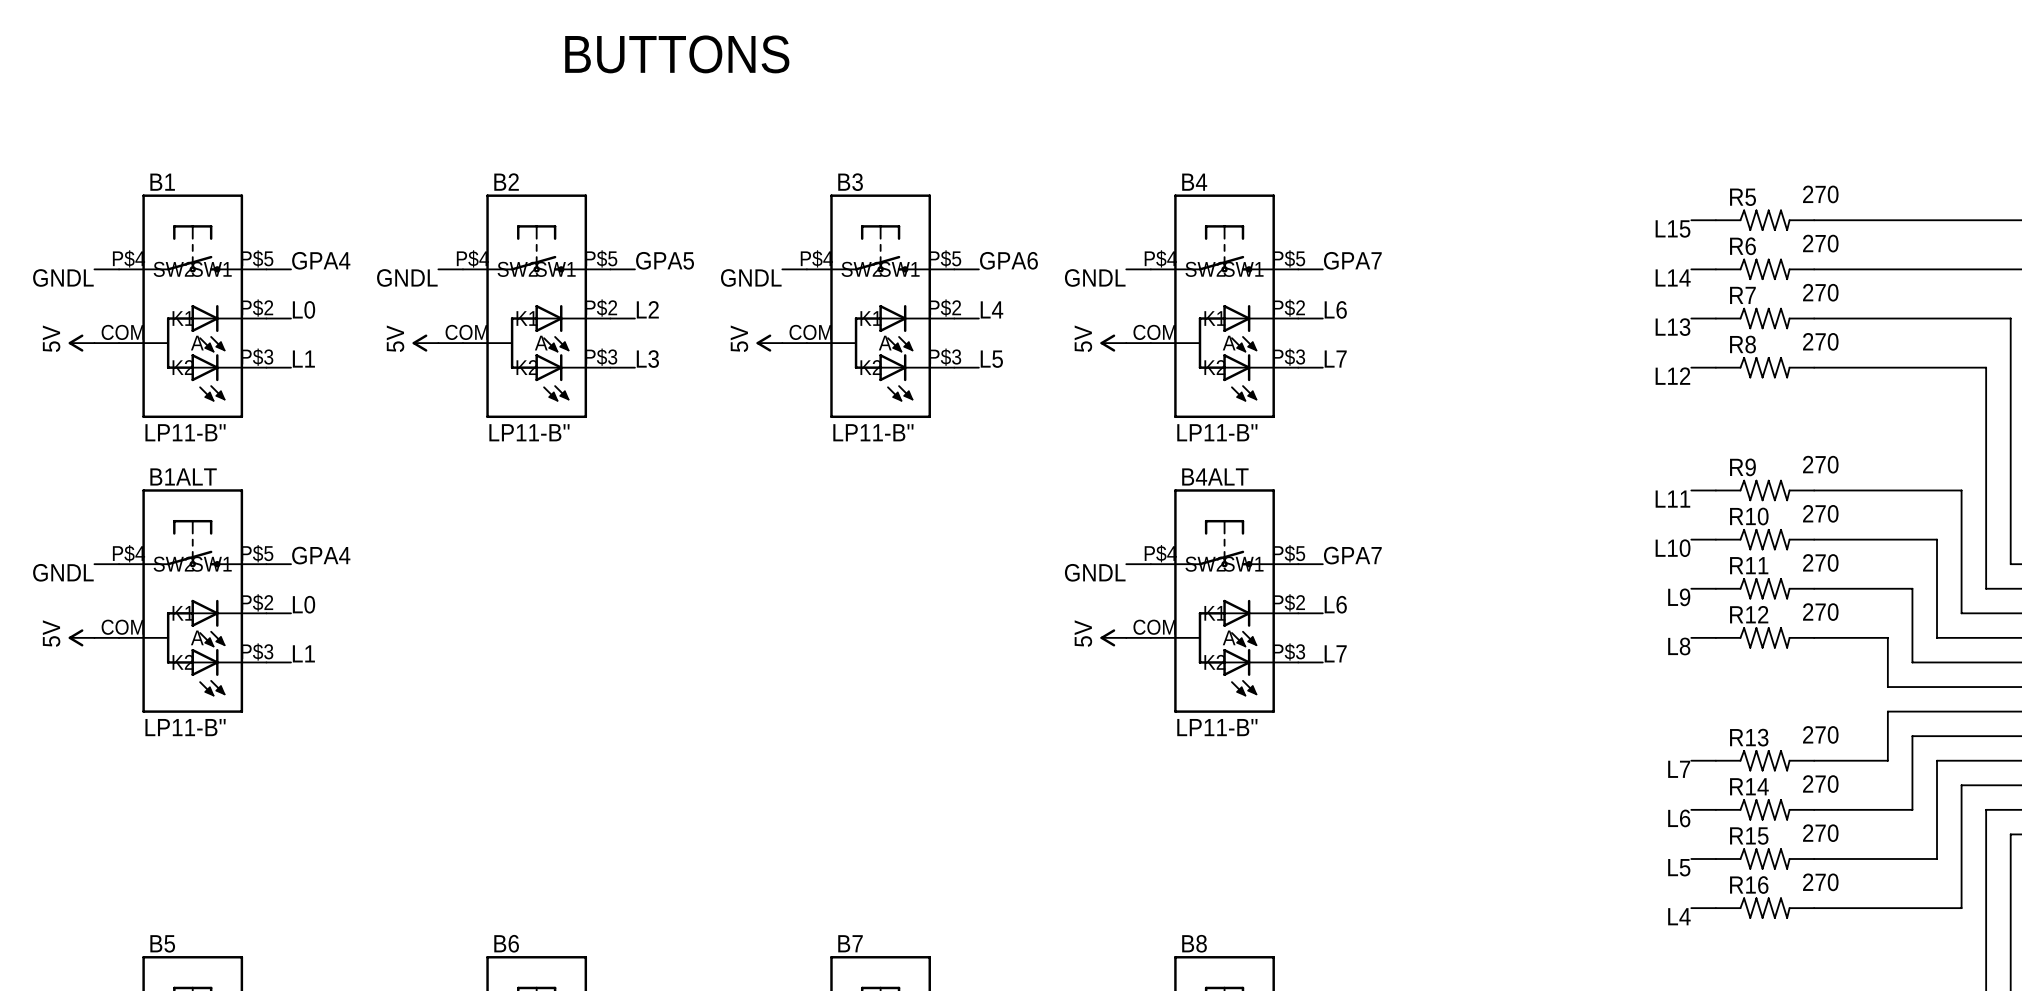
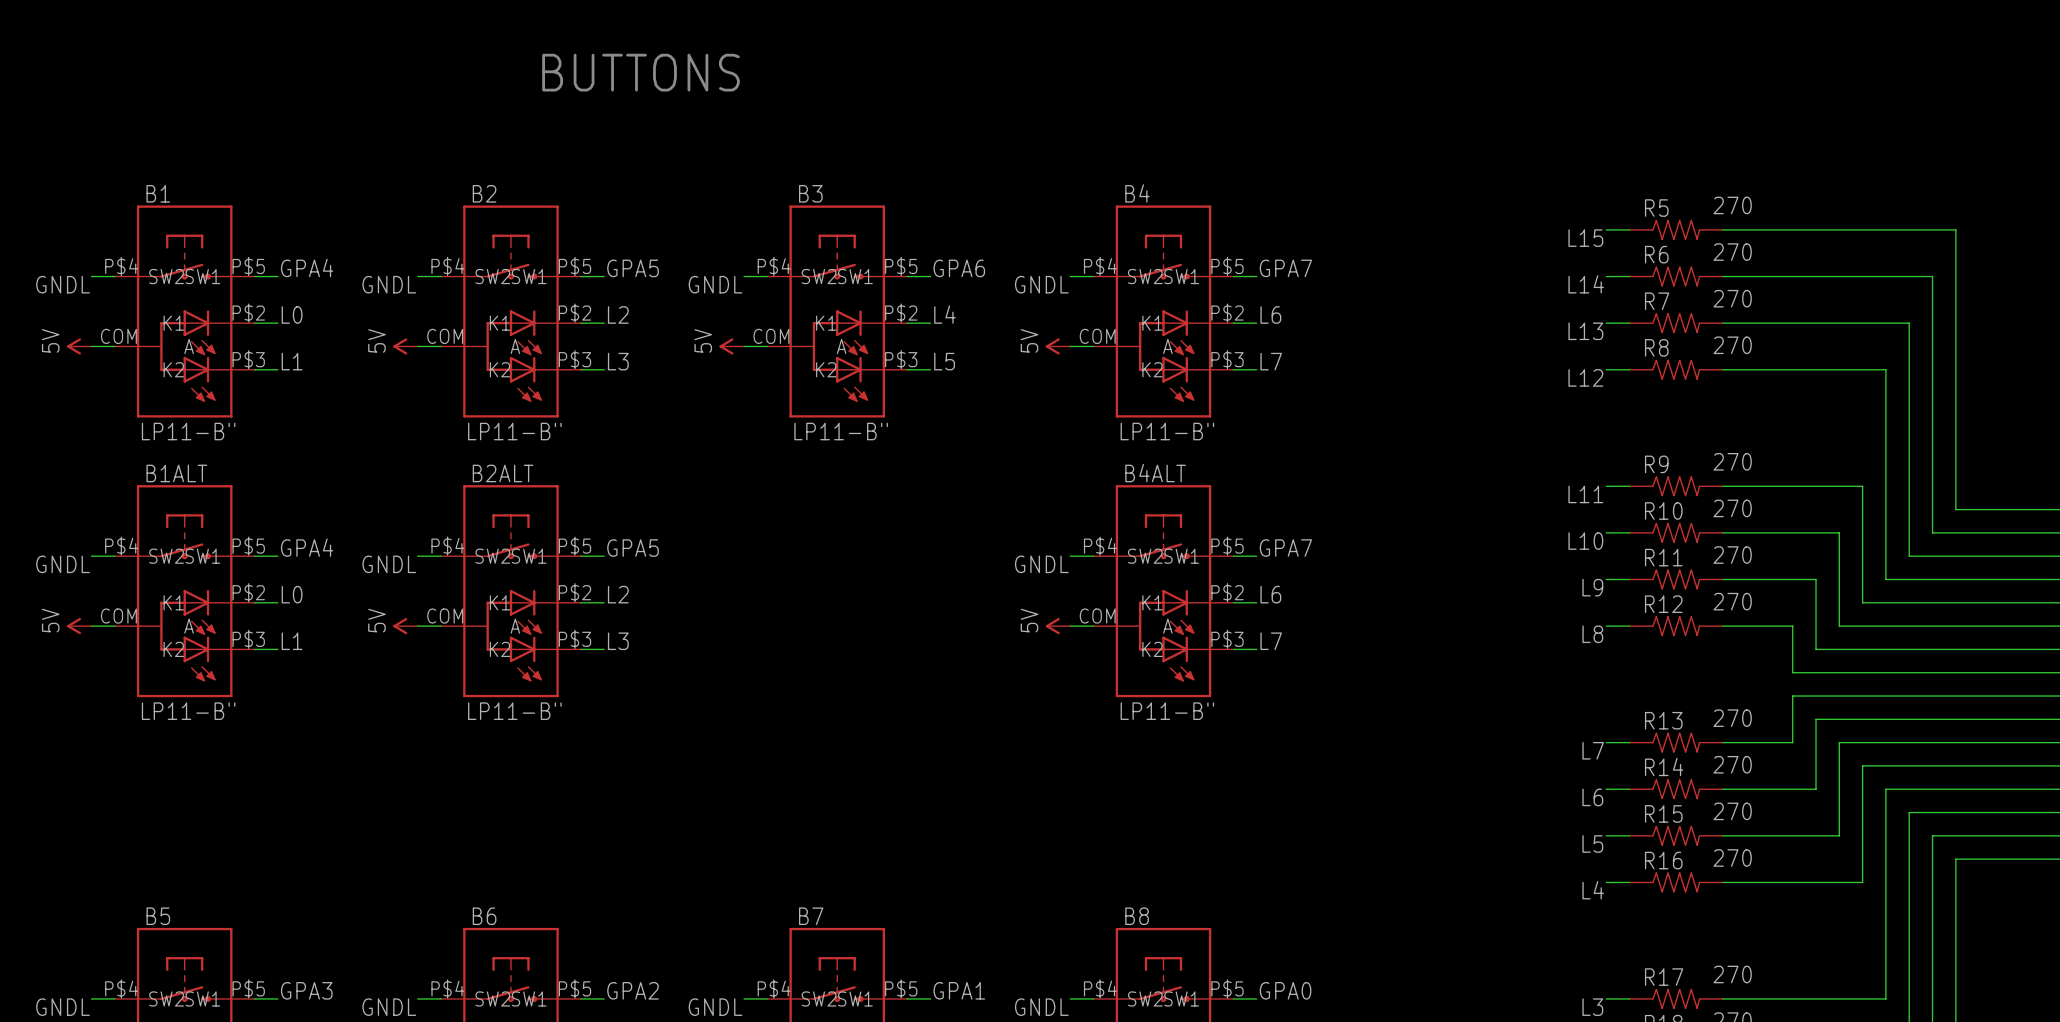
label: none -> GPA5 (633, 548)
wire: none -> (417, 556) (441, 556)
wire: none -> (580, 556) (604, 556)
label: none -> GNDL (389, 564)
B2ALT: none -> LP11-B" (510, 591)
label: none -> L2 (618, 594)
wire: none -> (580, 602) (604, 602)
power symbol: none -> 5V (405, 626)
wire: none -> (417, 626) (441, 626)
label: none -> L3 (618, 641)
wire: none -> (580, 649) (604, 649)

